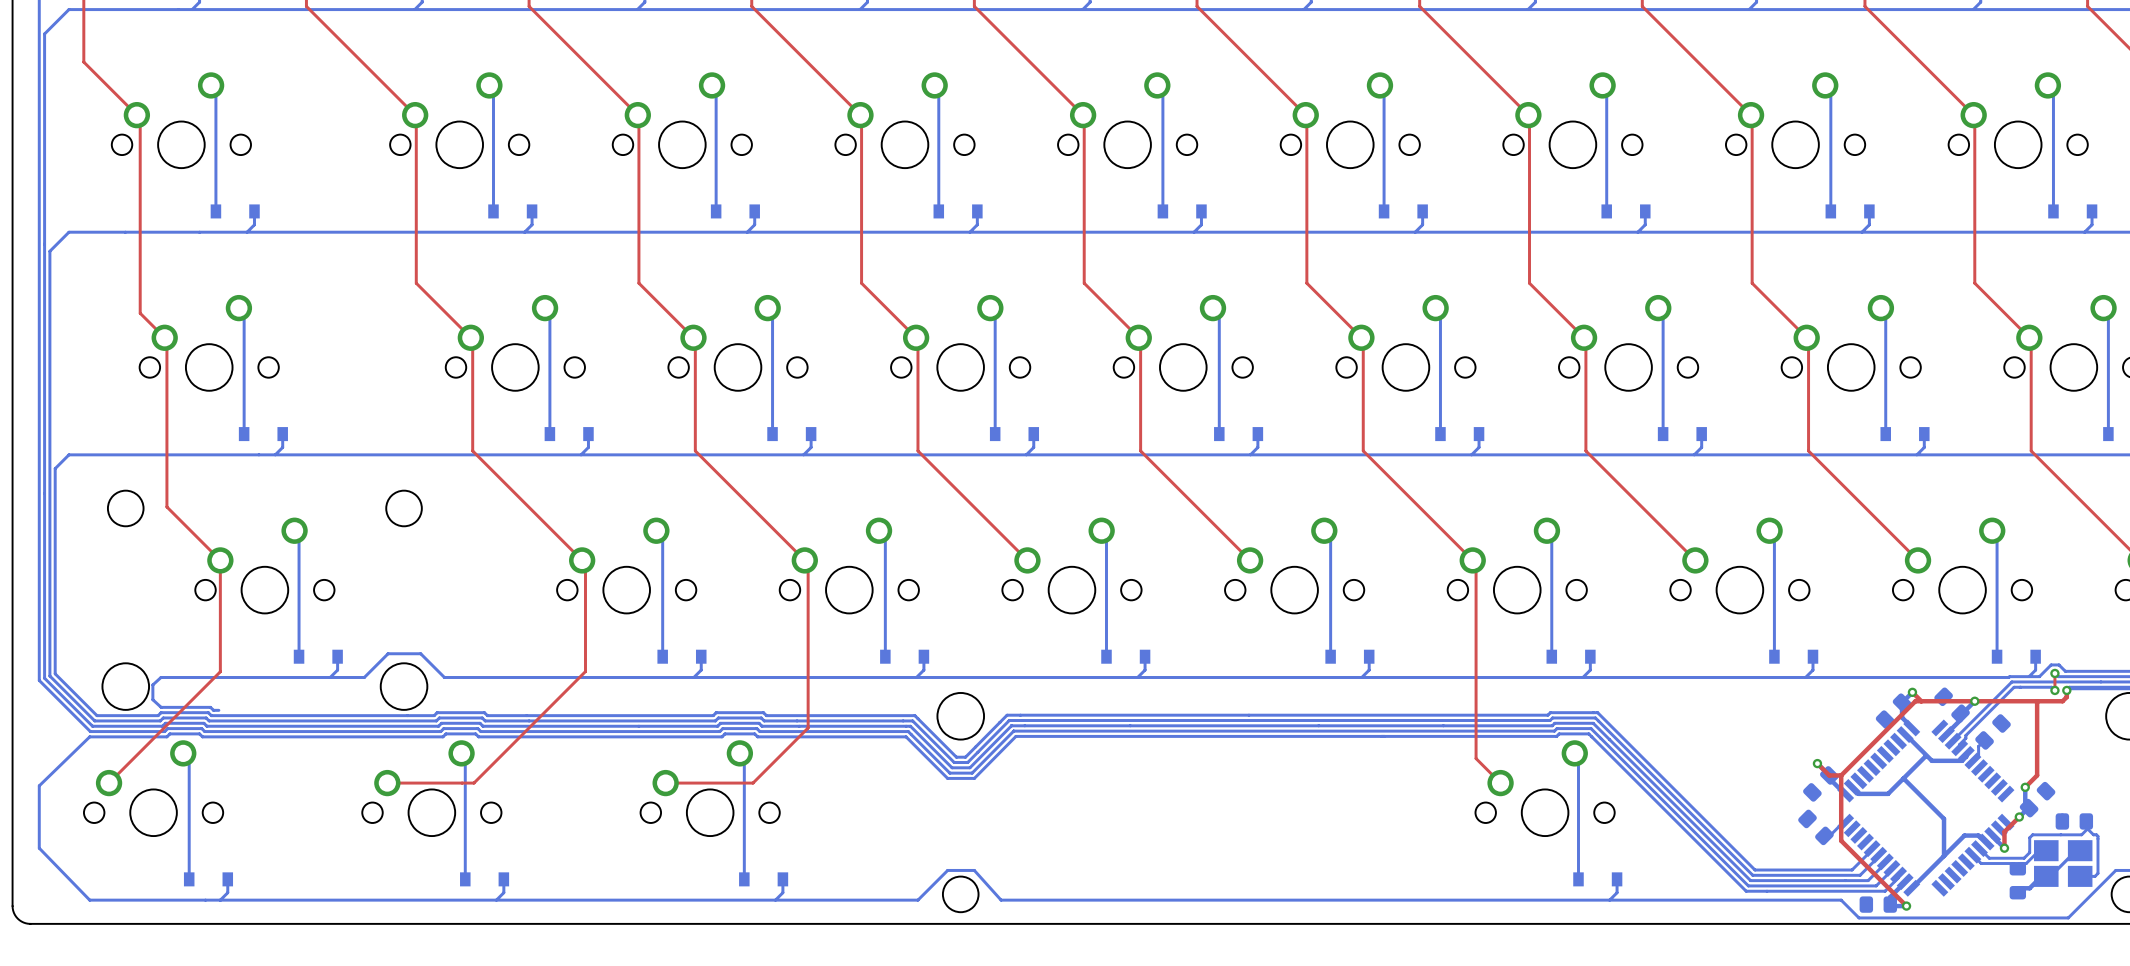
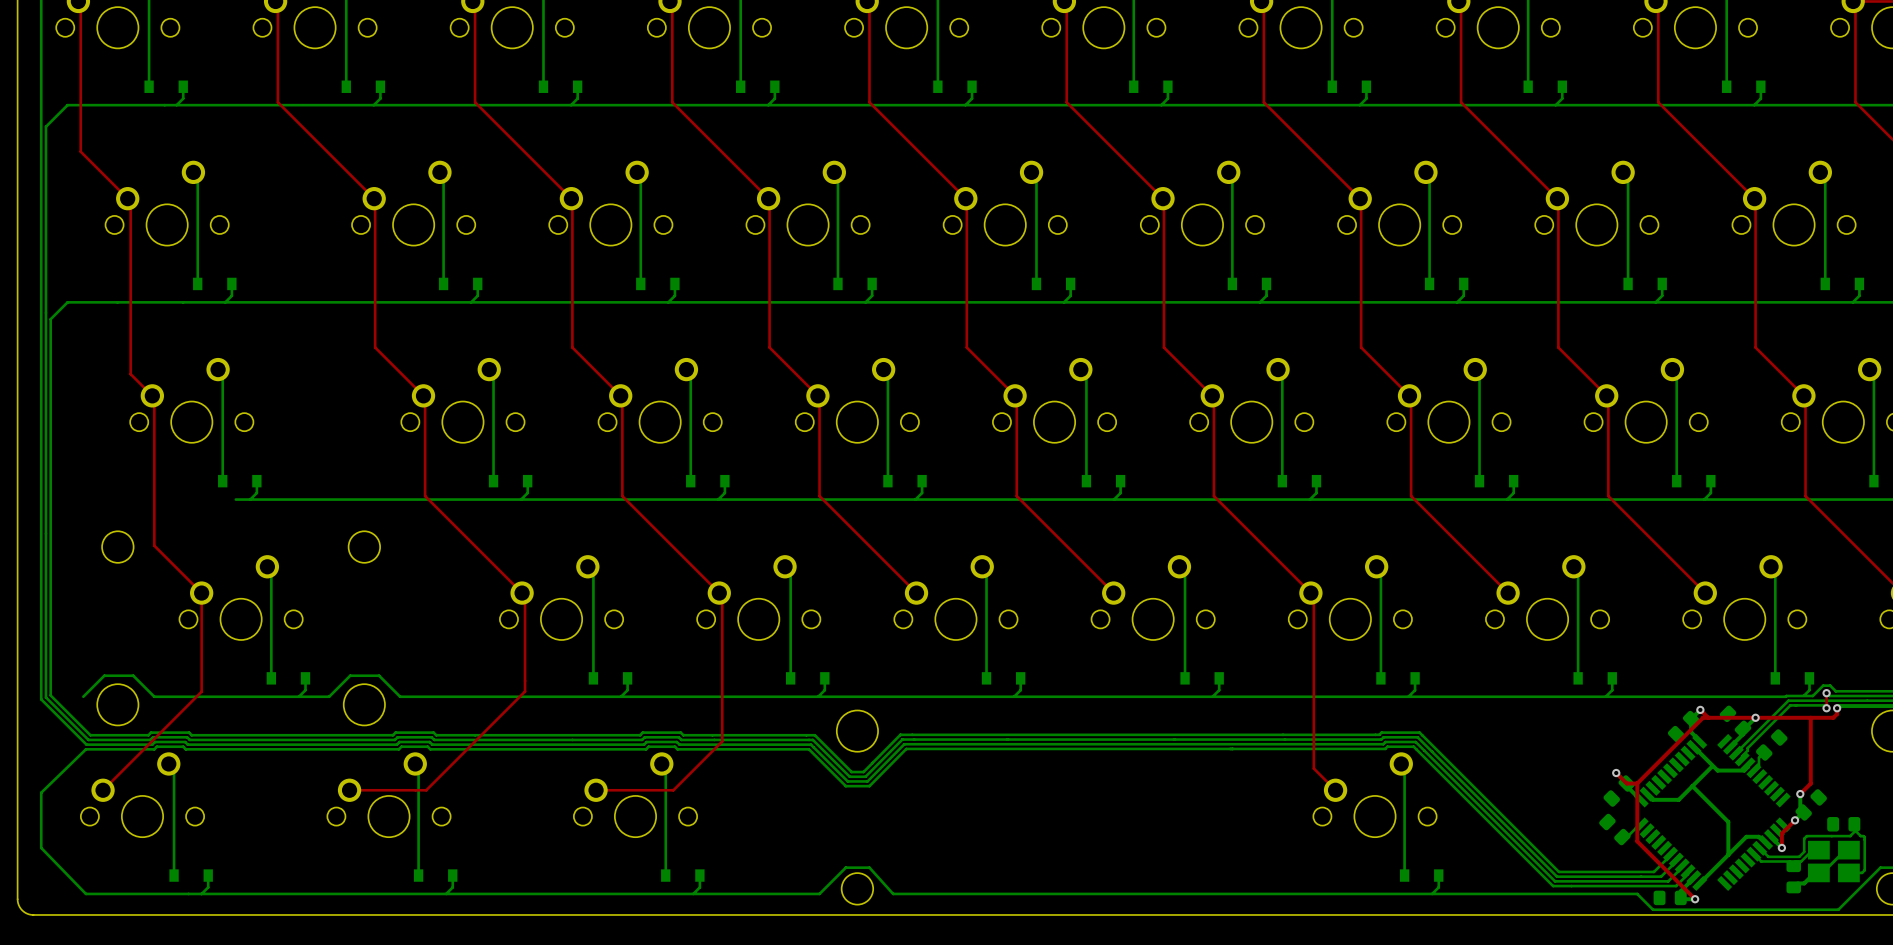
bottom track: (258, 454) (68, 454) (55, 468) (55, 673) (96, 715) (158, 715) (161, 712) (208, 712) (211, 715) (434, 715) (437, 712) (484, 712) (487, 715) (713, 715) (716, 712) (763, 712) (766, 715) (914, 715) (956, 757) (965, 757) (1007, 715) (1547, 715) (1550, 712) (1597, 712) (1755, 870) (1852, 870) (1870, 851) -> none
bottom track: (166, 677) (160, 677) (152, 684) (152, 699) (161, 707) (210, 707) (213, 710) (218, 710) -> (154, 696) (133, 675) (104, 675) (83, 696)

